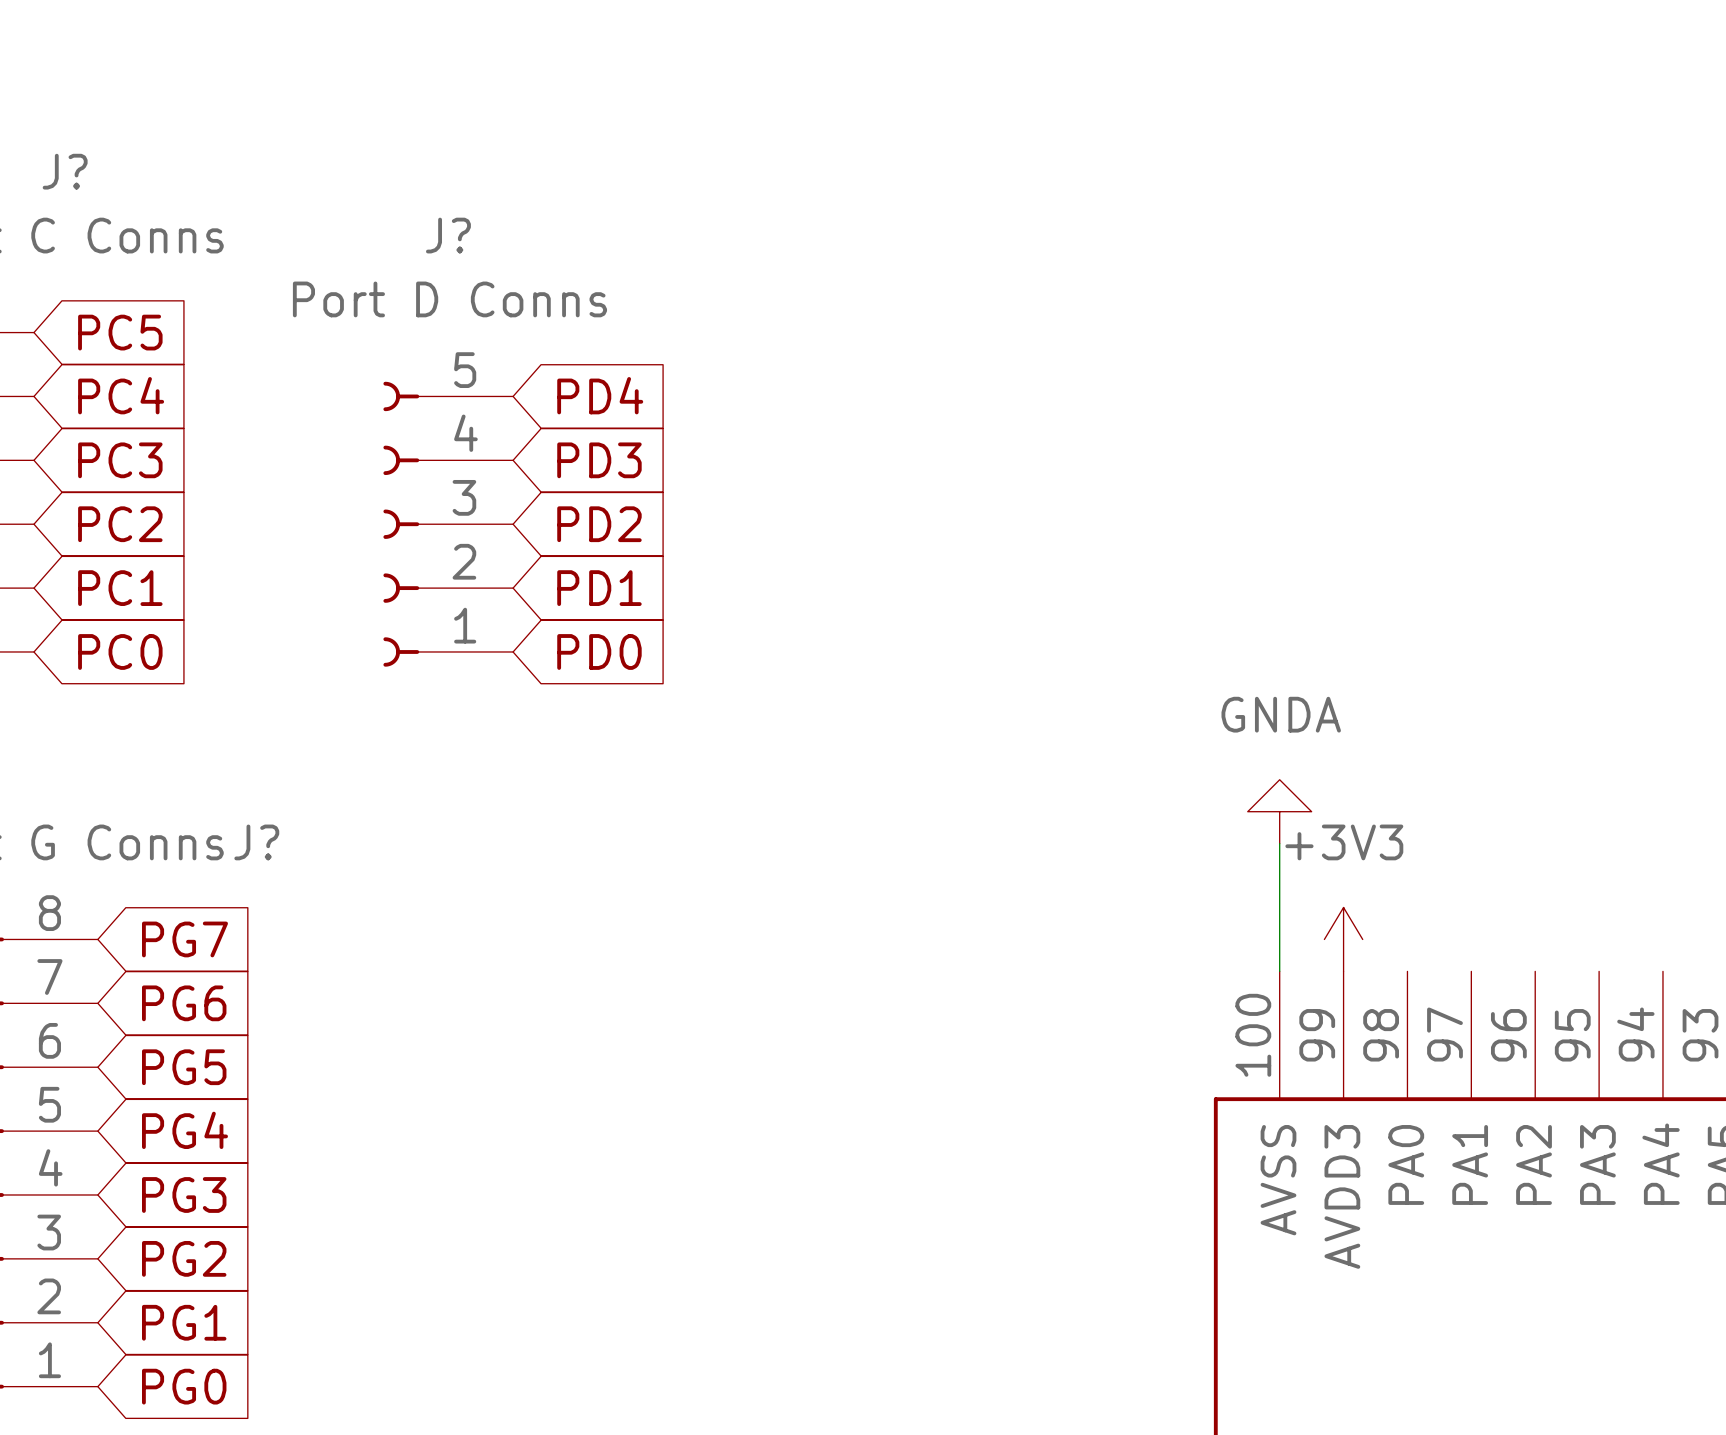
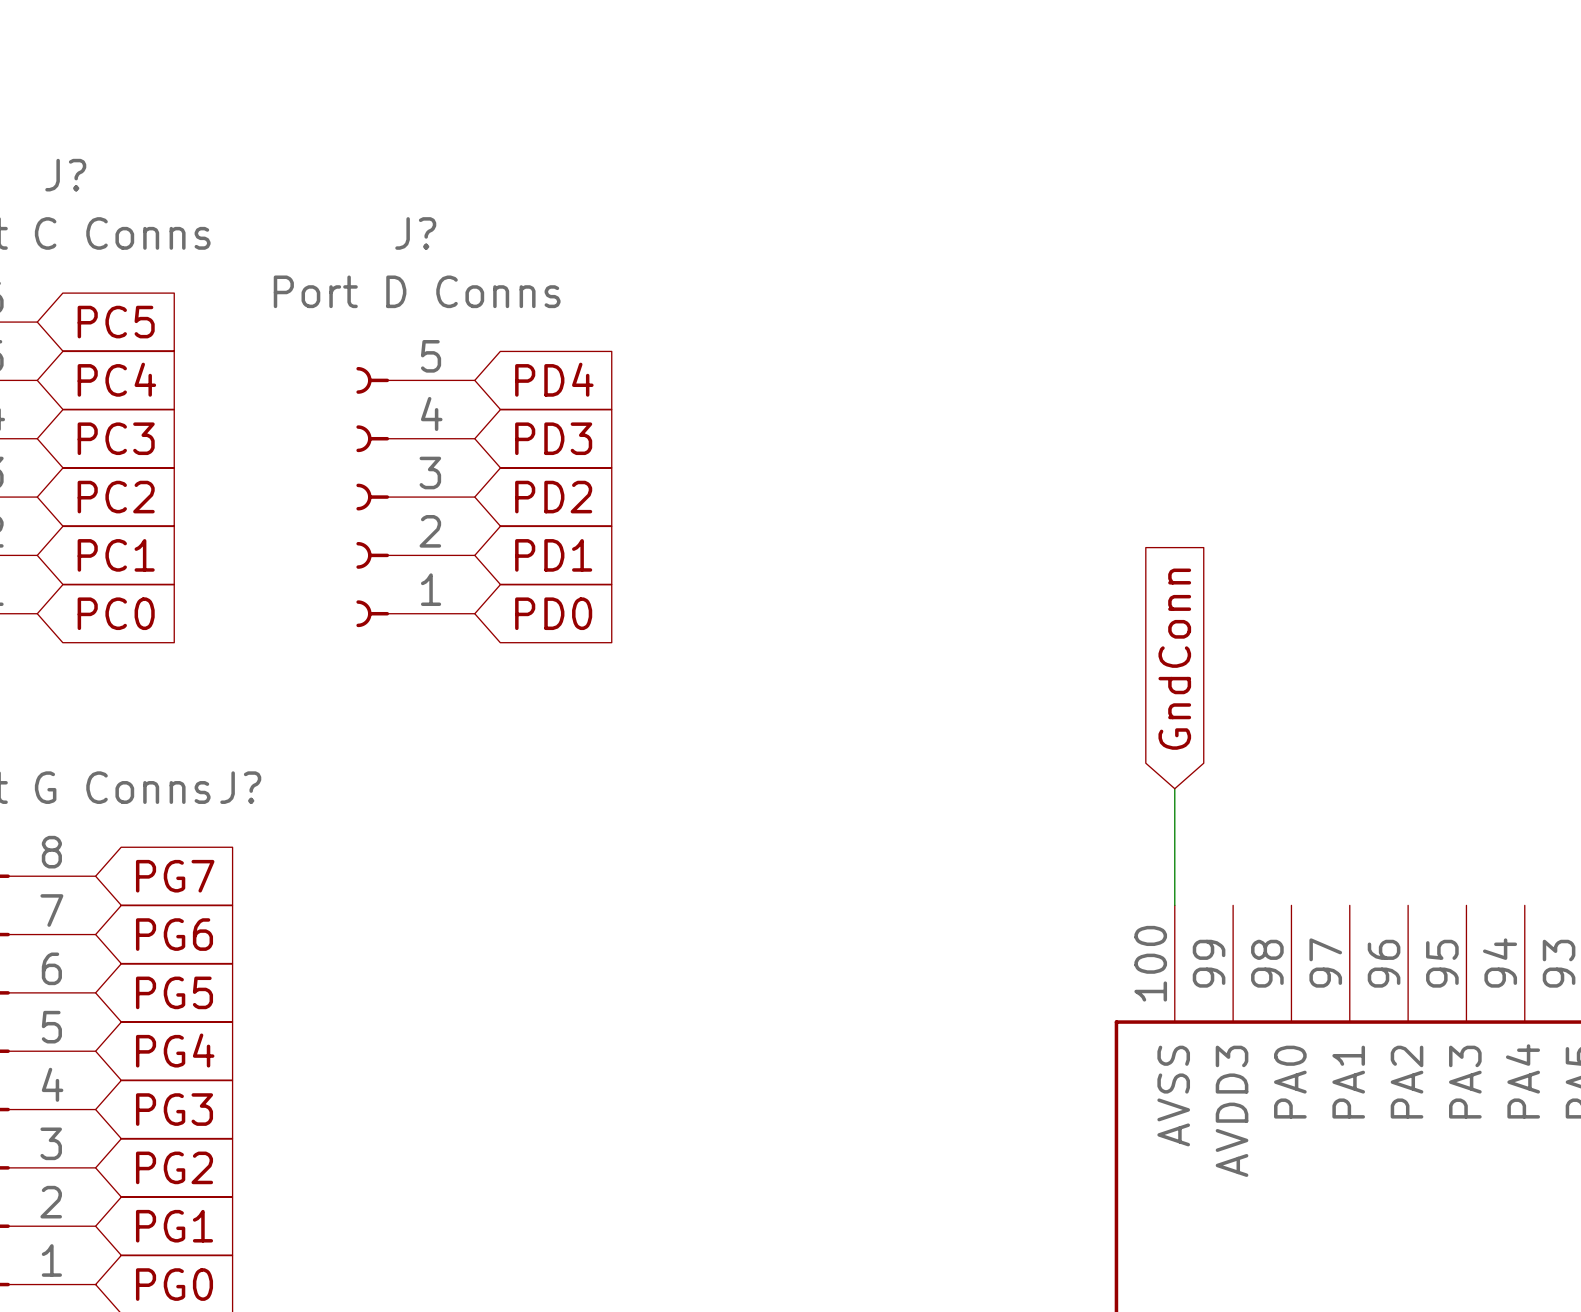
global label: none -> GndConn (1174, 659)
power symbol: GNDA (1279, 811) -> none
power symbol: +3V3 (1343, 939) -> none

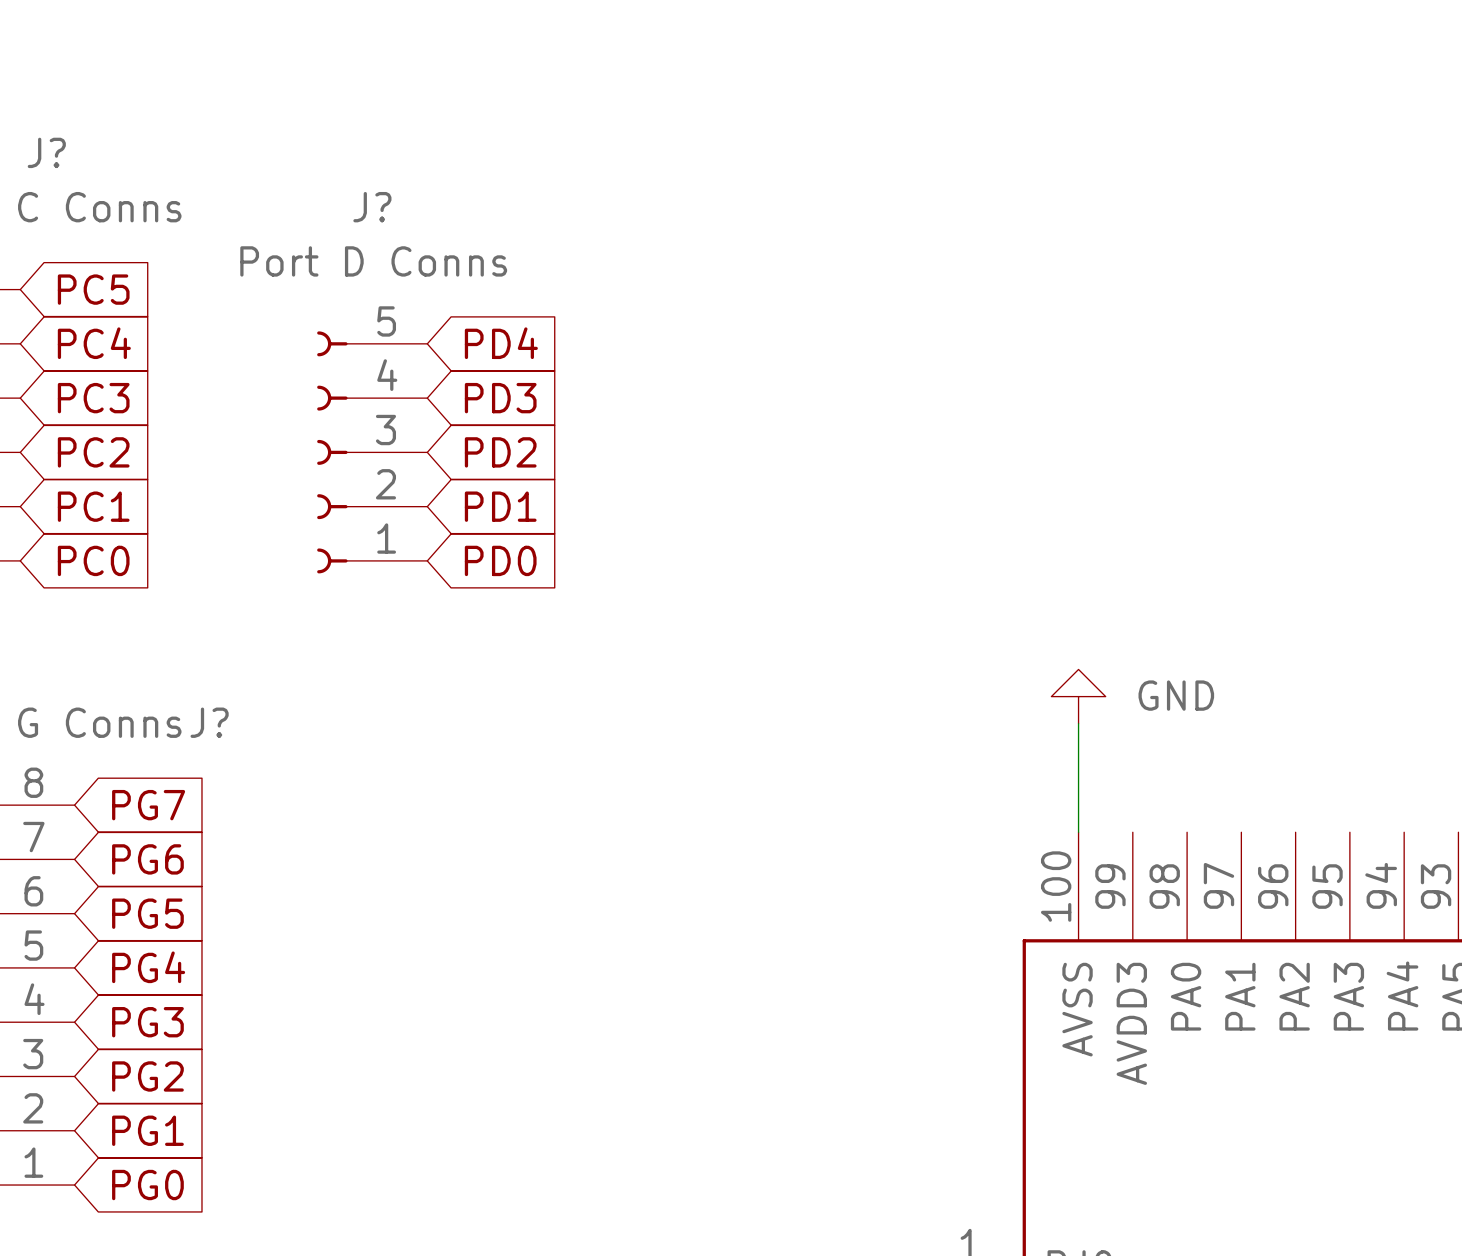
global label: GndConn (1174, 659) -> none
power symbol: none -> GND (1078, 696)

